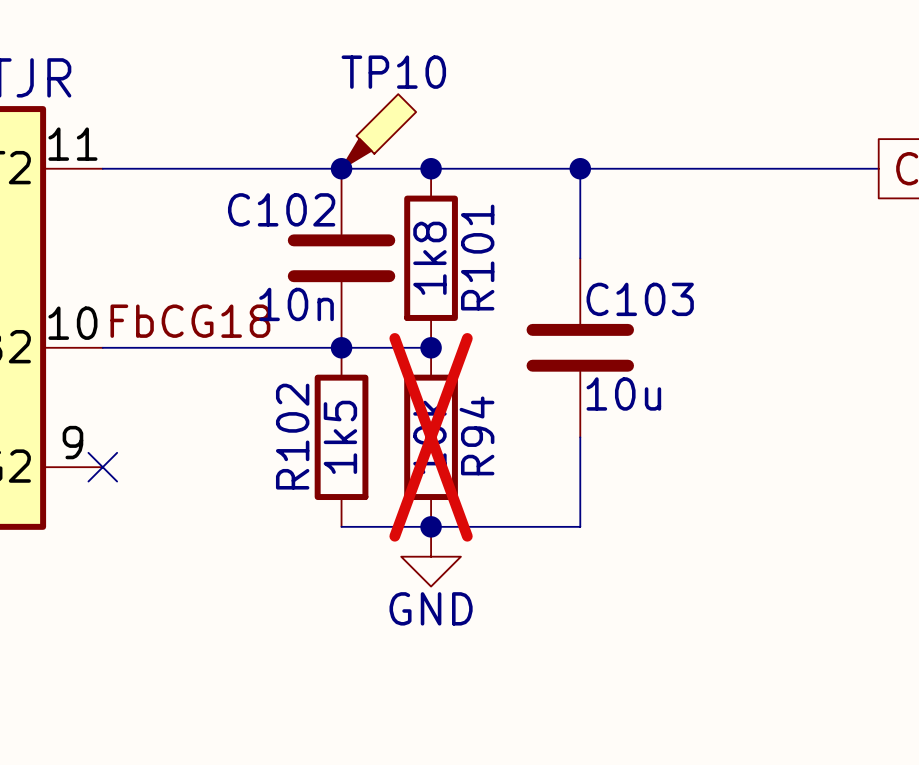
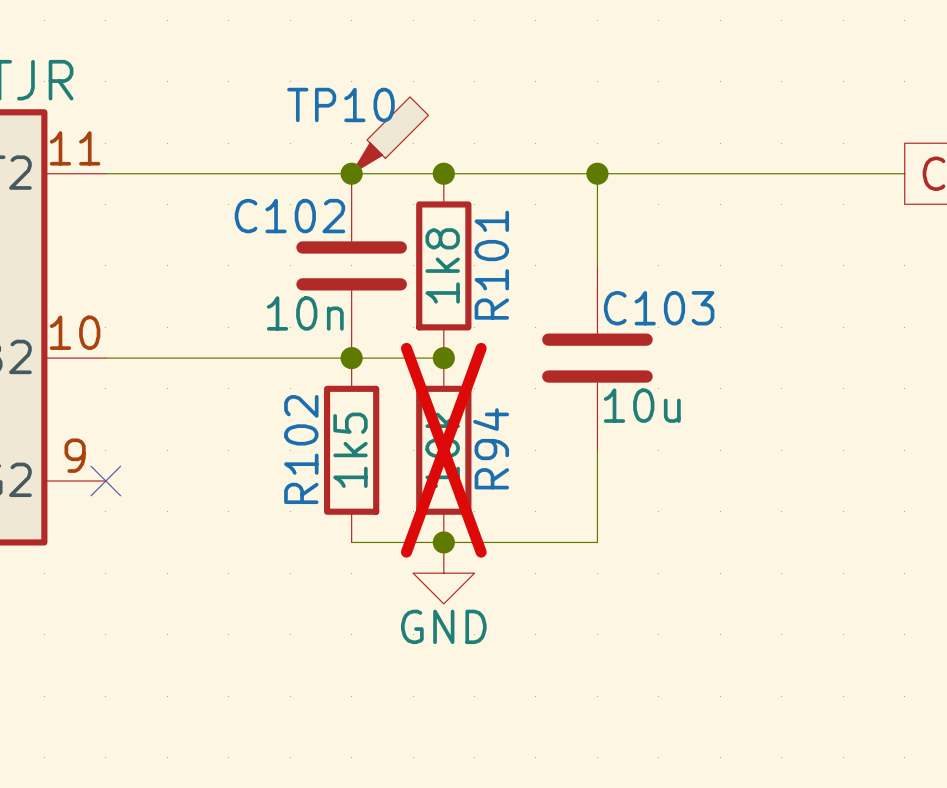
TP10 name position: TP10 (393, 72) -> TP10 (340, 104)
label: FbCG18 (190, 321) -> none

